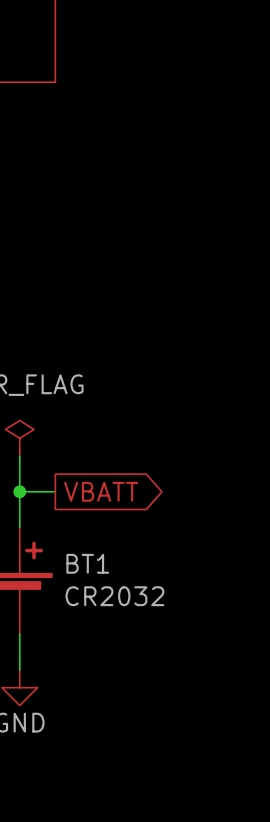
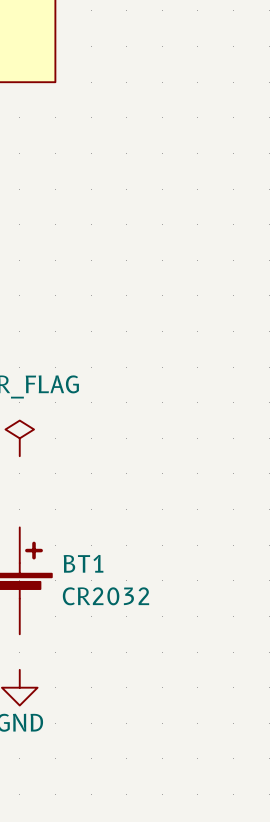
wire: (19, 456) (19, 527) -> none
wire: (19, 491) (55, 491) -> none
junction: (19, 491) -> none
global label: VBATT (101, 491) -> none
wire: (19, 634) (19, 669) -> none

